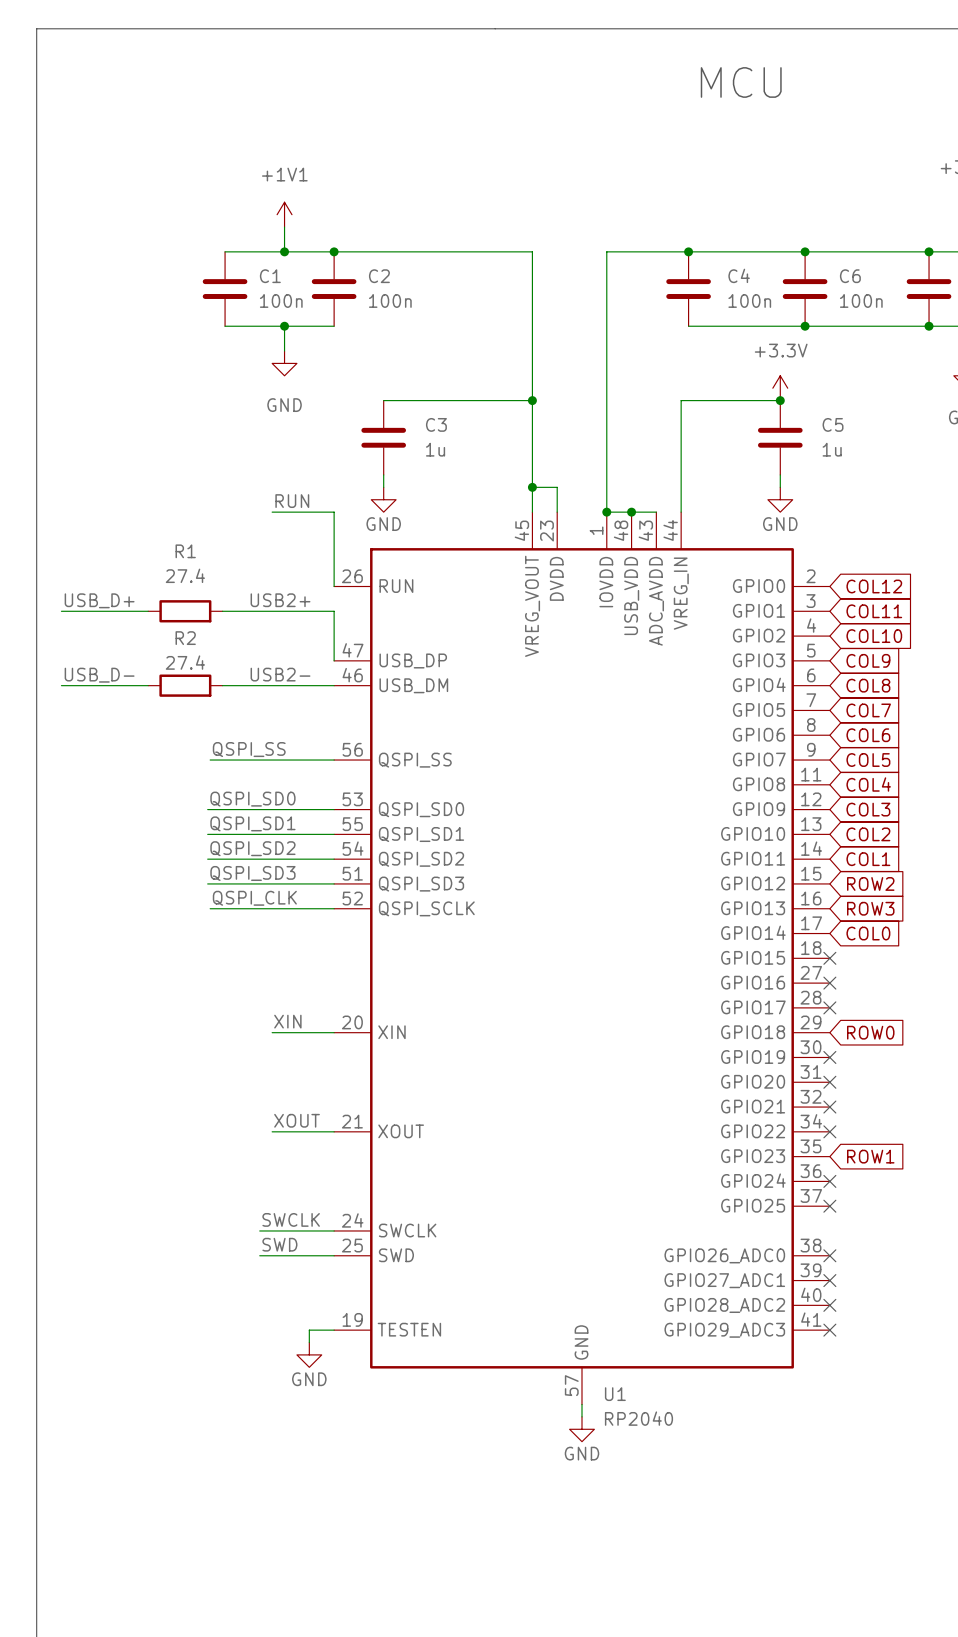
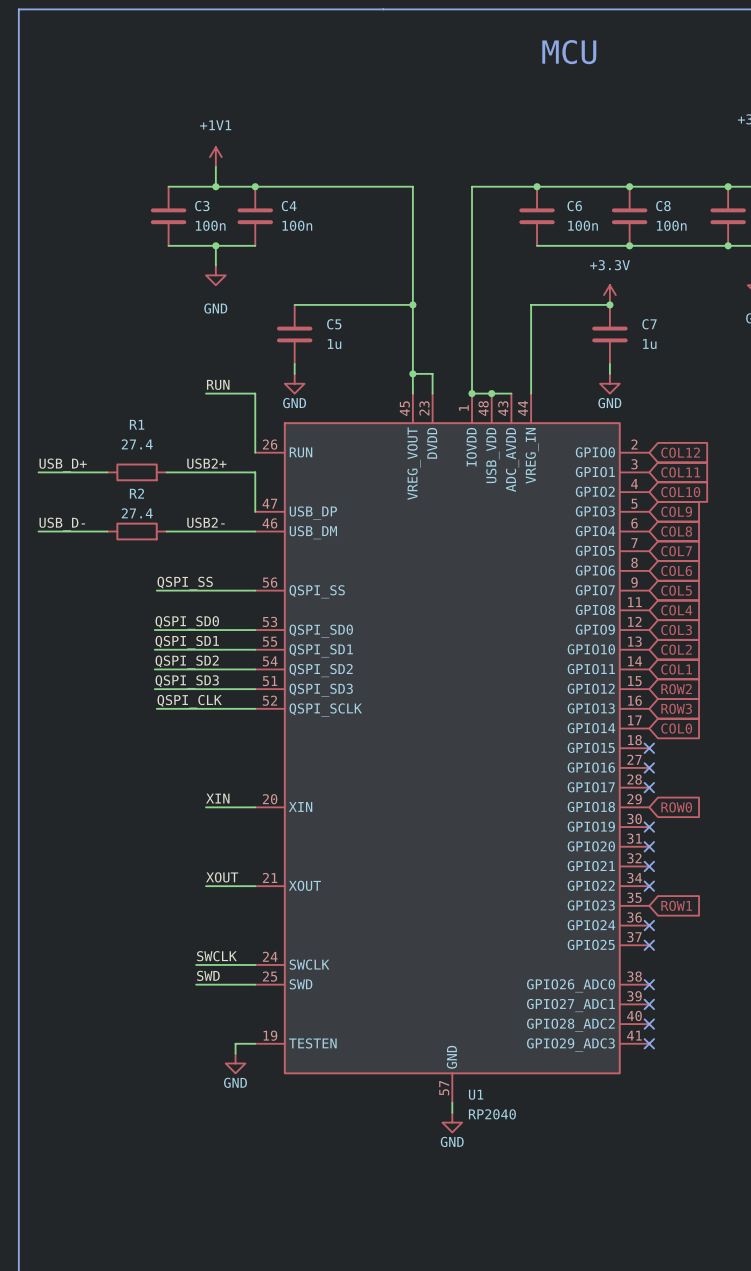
C4 name: C4 (739, 275) -> C6 (574, 206)
C1 name: C1 (270, 276) -> C3 (202, 206)
C2 name: C2 (379, 276) -> C4 (289, 206)
C6 name: C6 (850, 276) -> C8 (663, 206)
C3 name: C3 (436, 424) -> C5 (334, 324)
C5 name: C5 (833, 424) -> C7 (649, 324)

